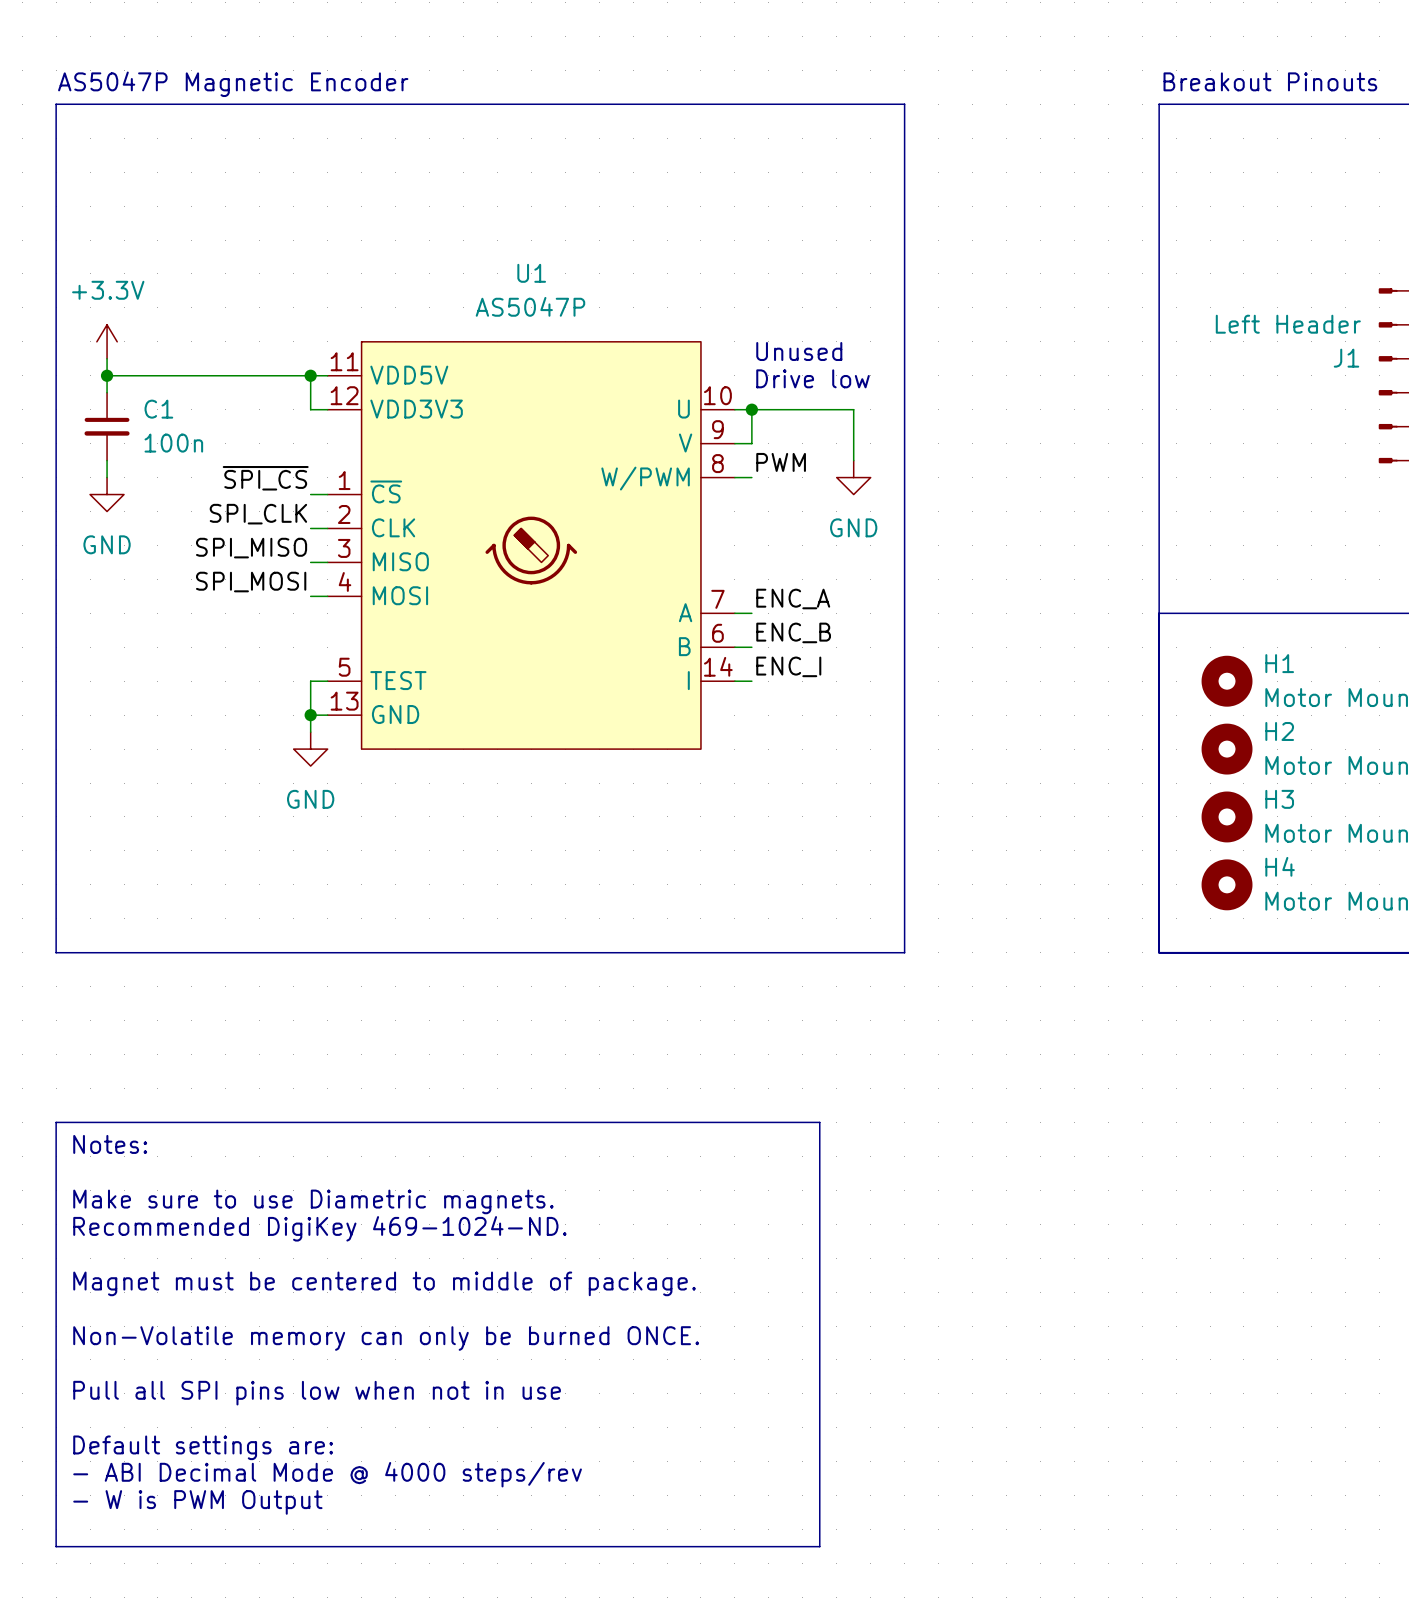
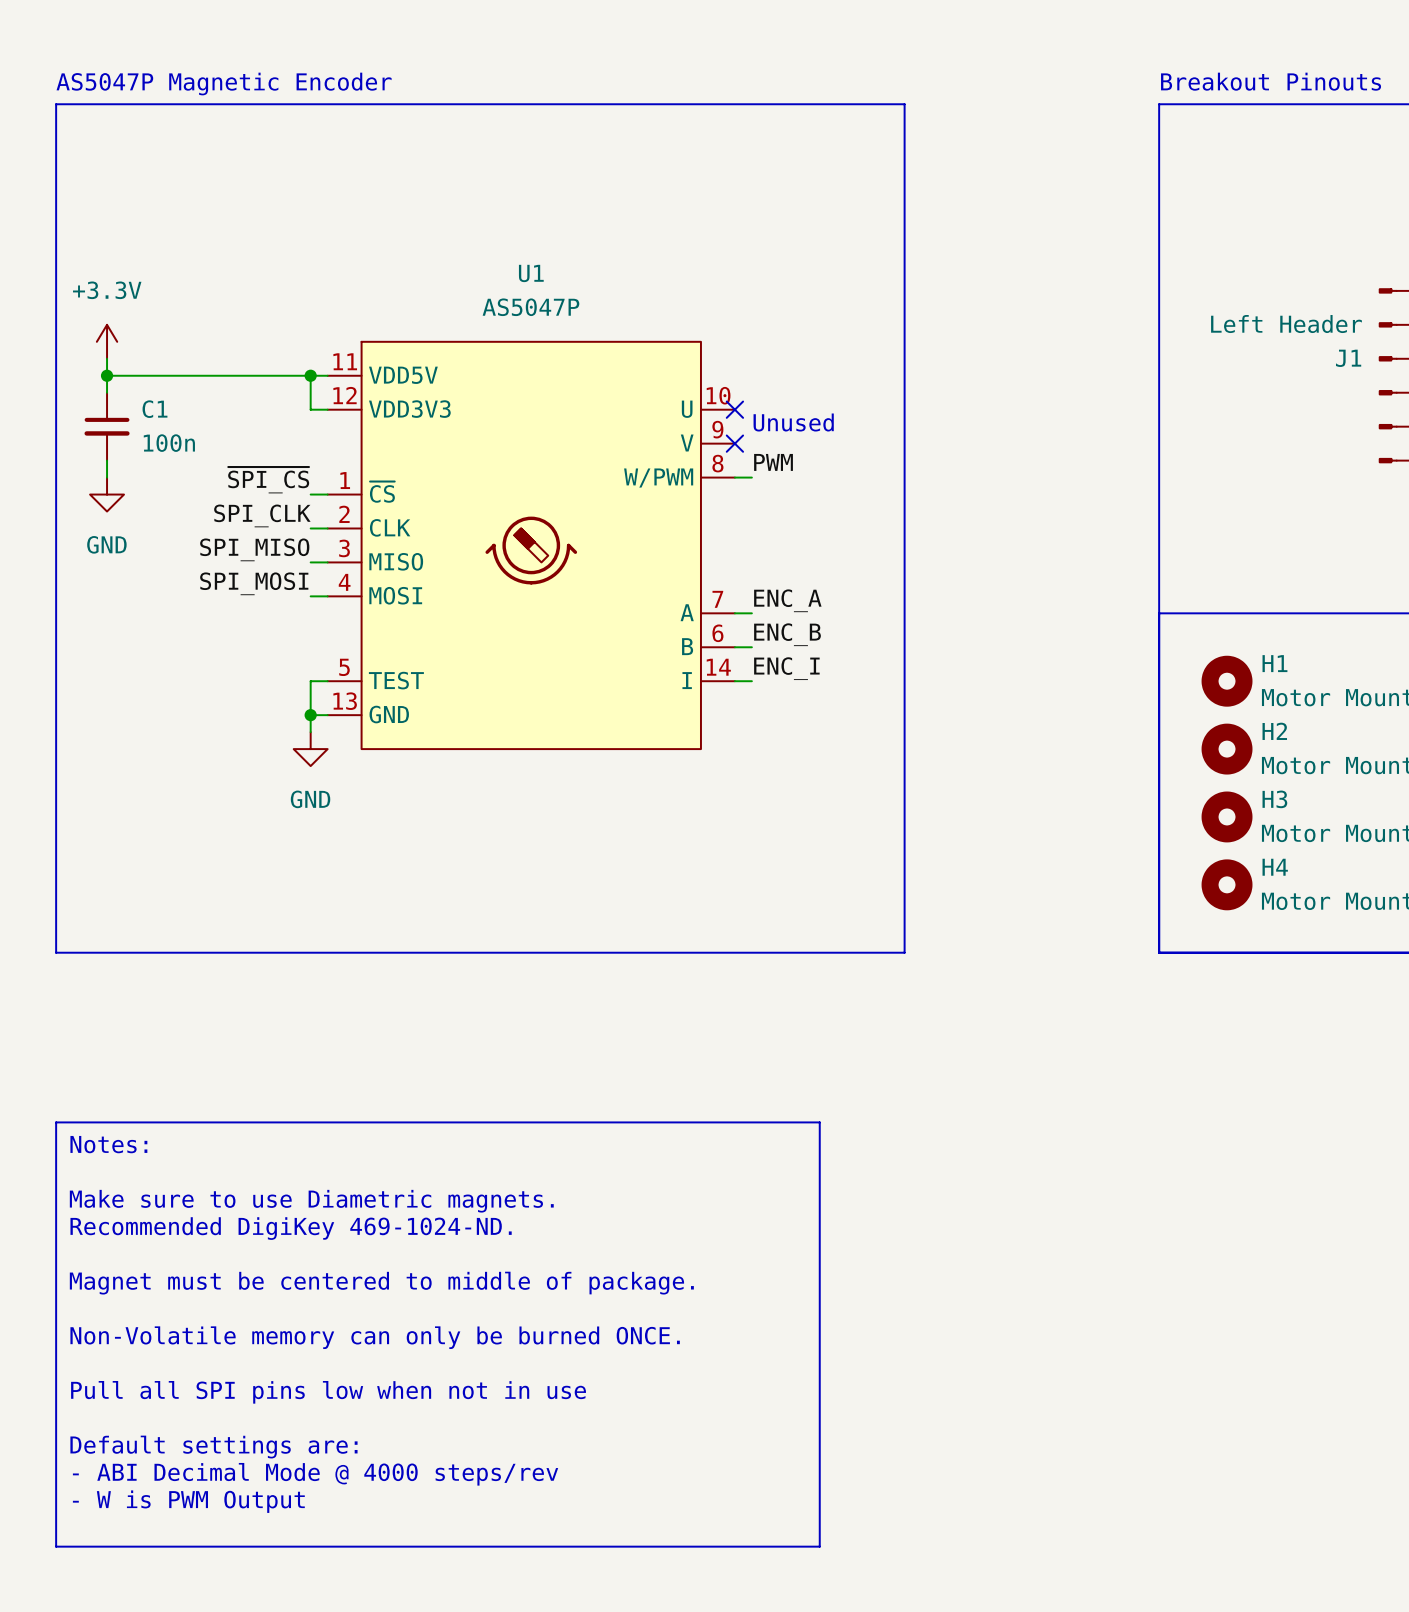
text position: Unused (799, 351) -> Unused (793, 422)
text: Drive low (813, 378) -> none
wire: (734, 409) (853, 409) (853, 460) -> none
no-connect mark: none -> (734, 409)
wire: (751, 409) (751, 443) (734, 443) -> none
junction: (751, 409) -> none
no-connect mark: none -> (734, 443)
power symbol: GND (853, 477) -> none

